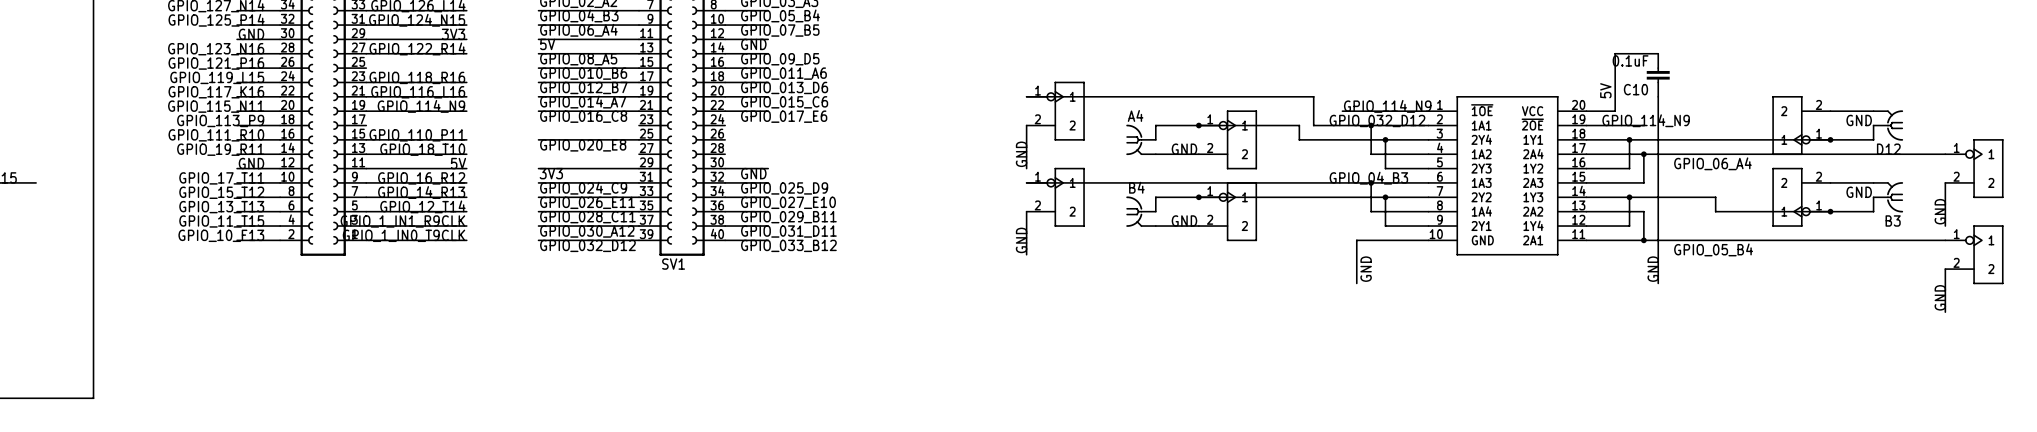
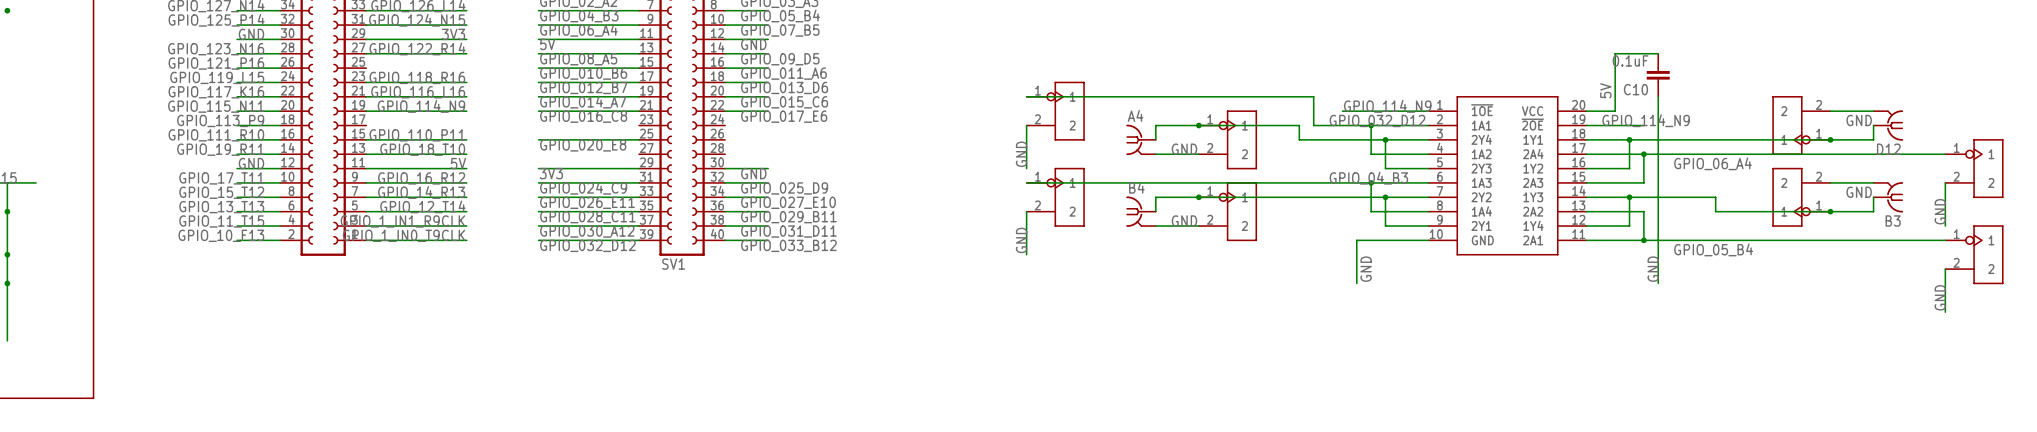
junction: none -> (7, 10)
wire: none -> (7, 182) (7, 340)
junction: none -> (7, 211)
junction: none -> (7, 254)
junction: none -> (7, 283)

